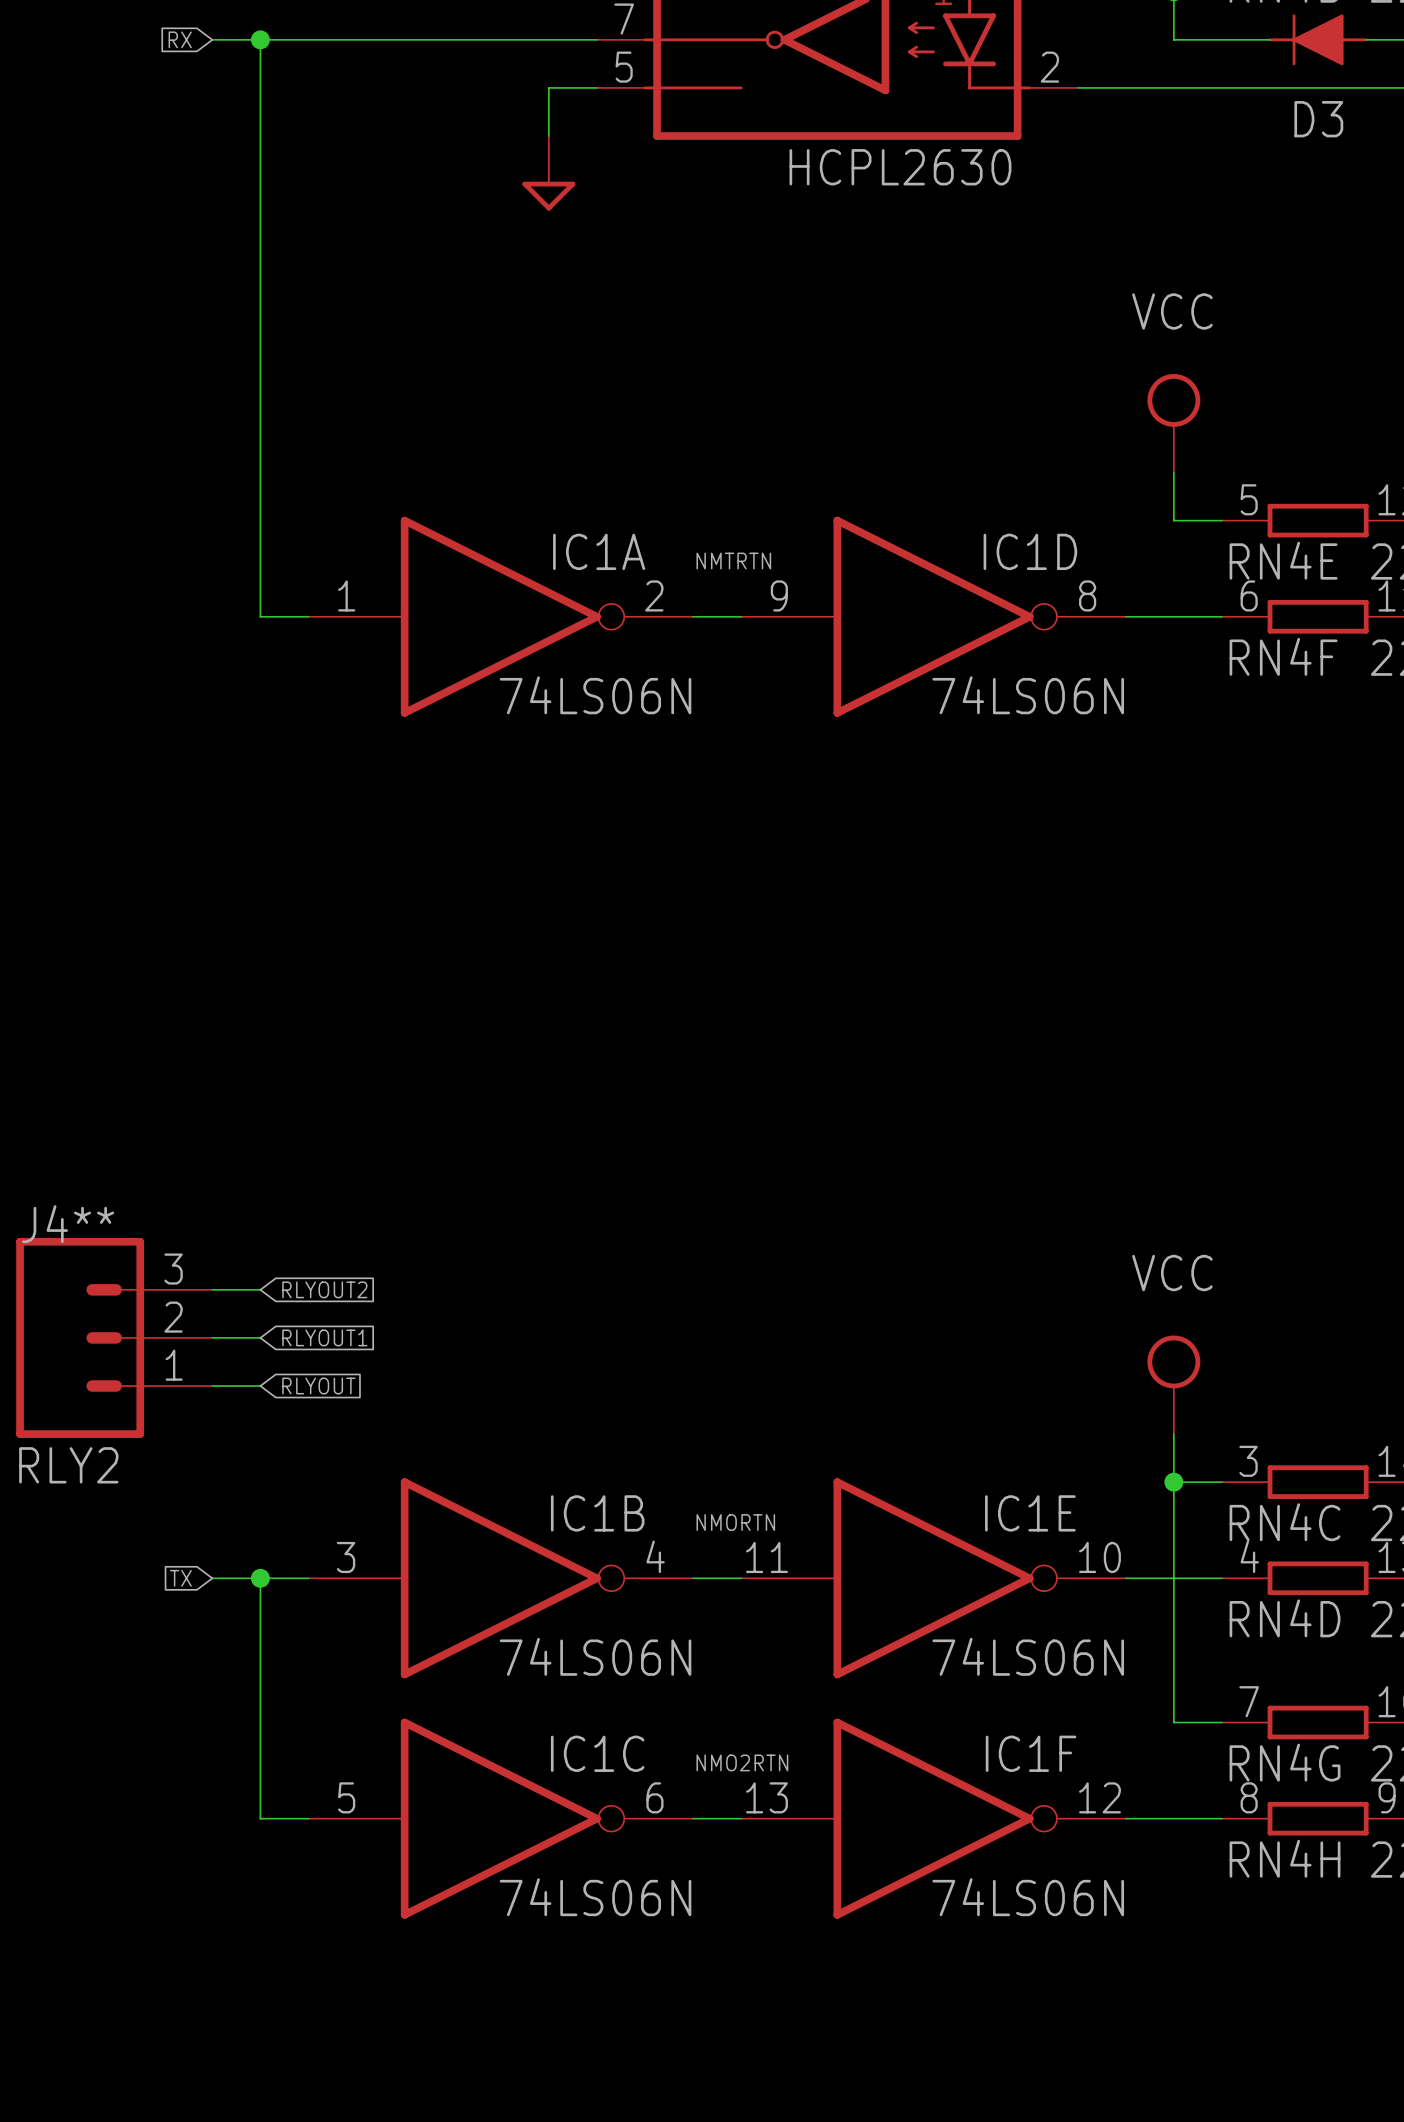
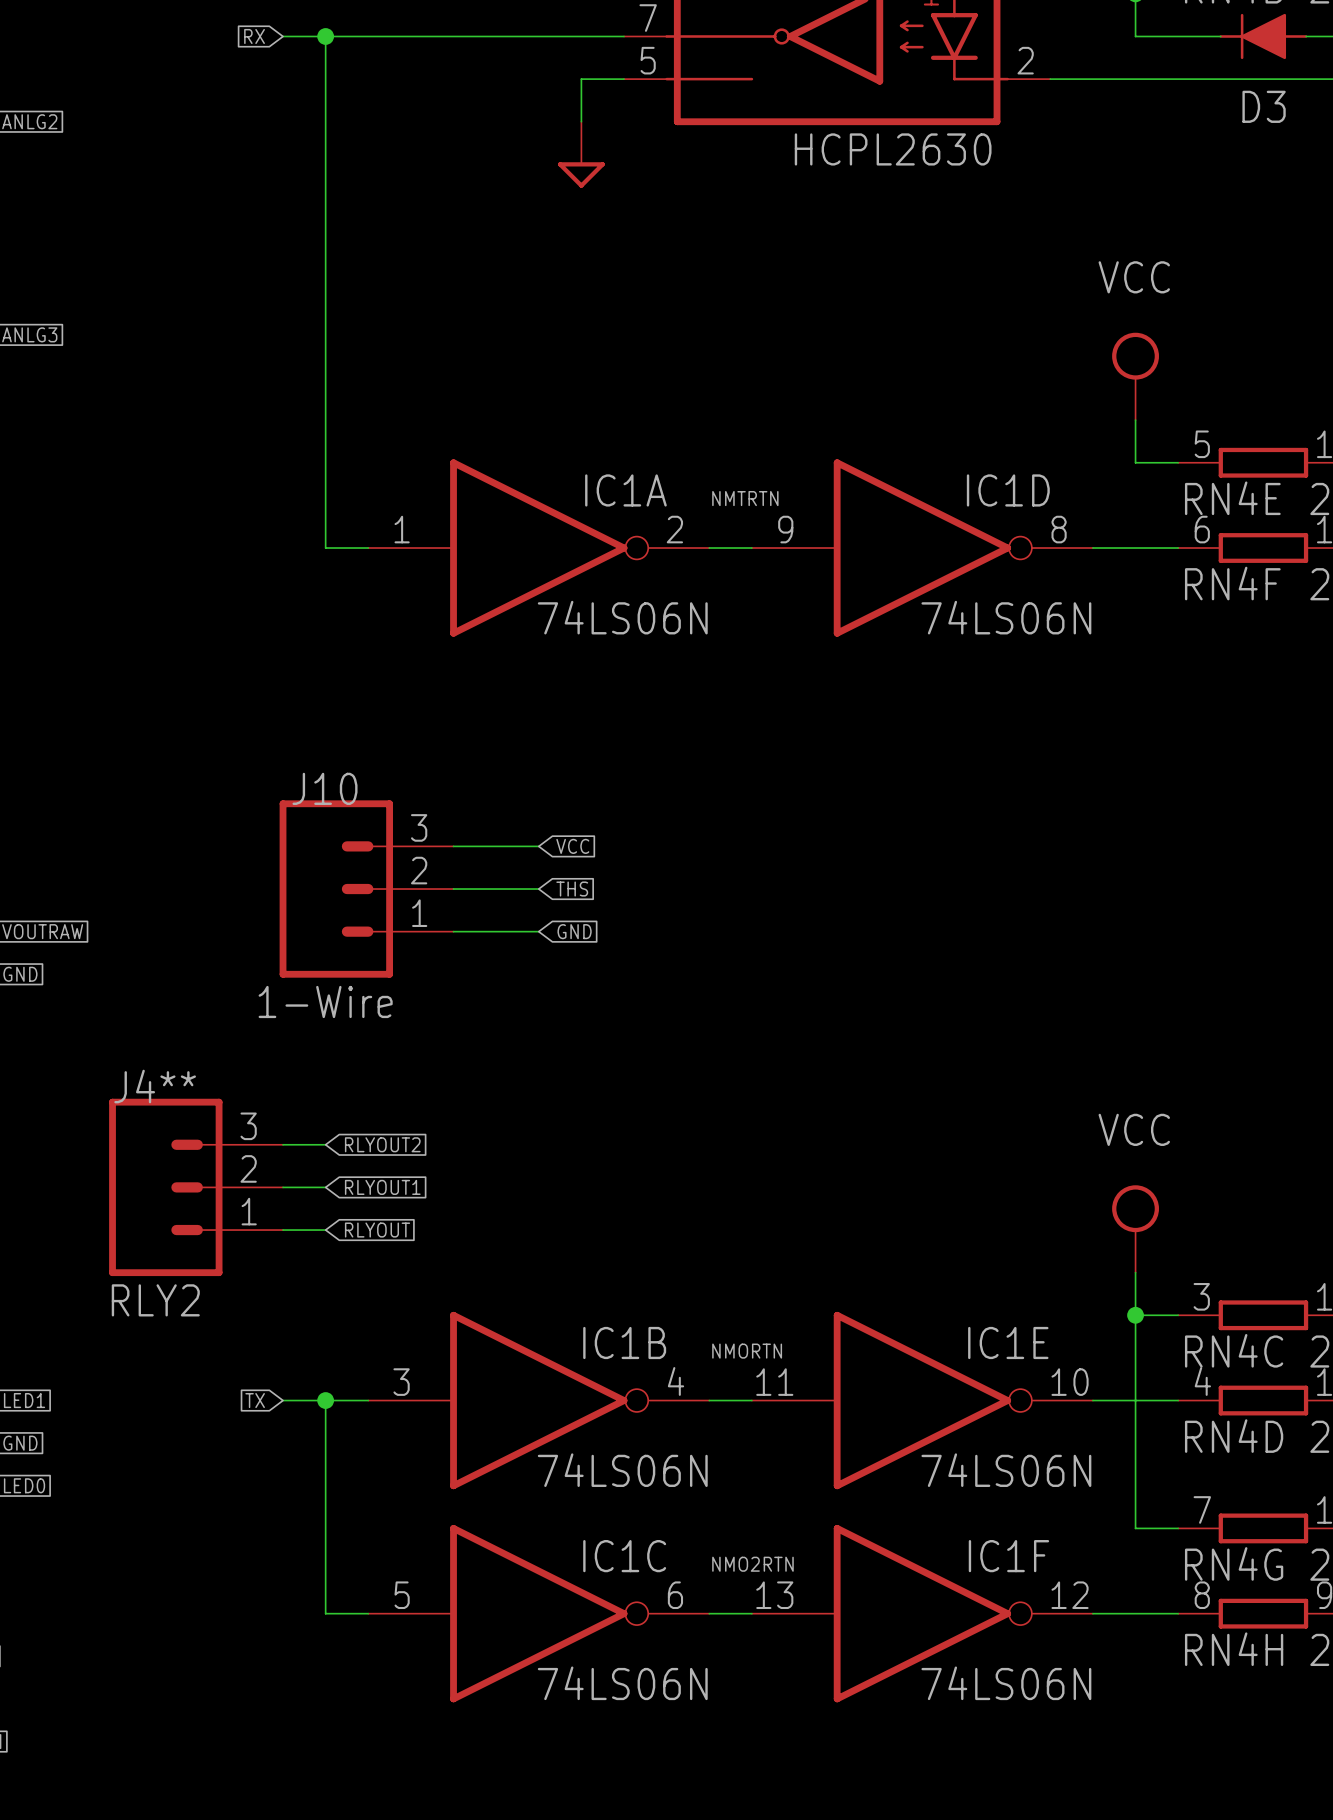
wire: none -> (453, 846) (538, 846)
global label: none -> VCC (572, 846)
J10: none -> 1-Wire (366, 889)
wire: none -> (453, 889) (538, 889)
global label: none -> THS (572, 889)
wire: none -> (453, 931) (538, 931)
global label: none -> GND (574, 931)

